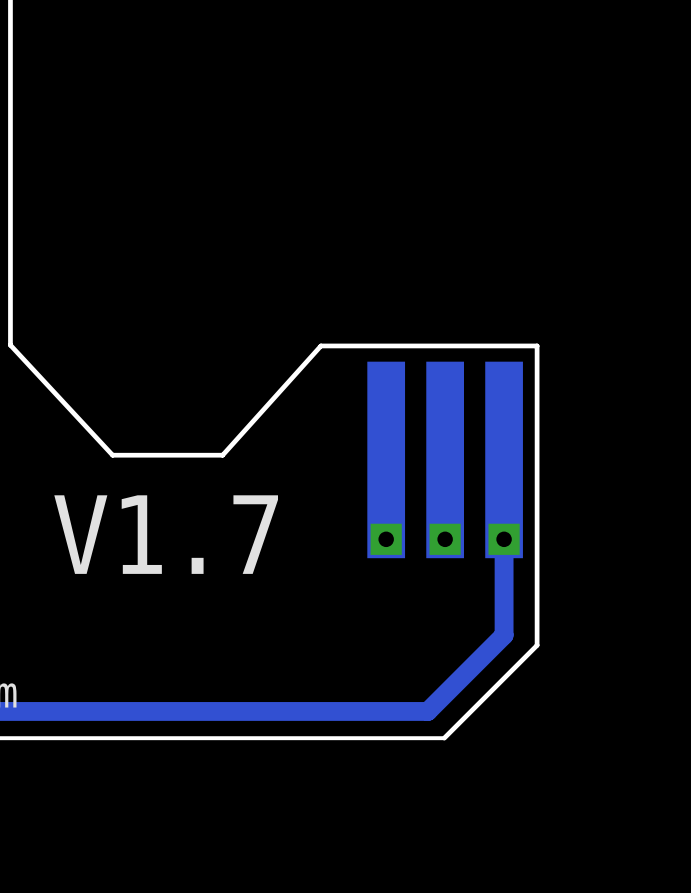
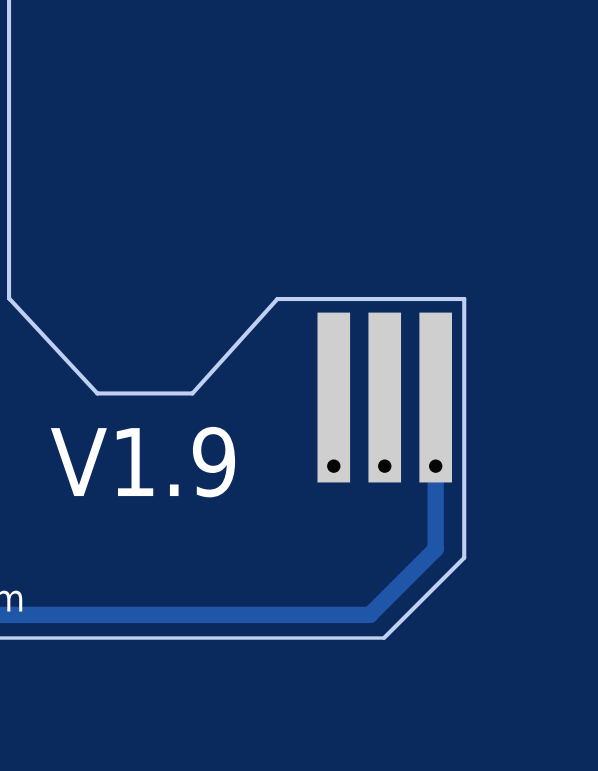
text: V1.7 (166, 534) -> V1.9 (142, 462)

